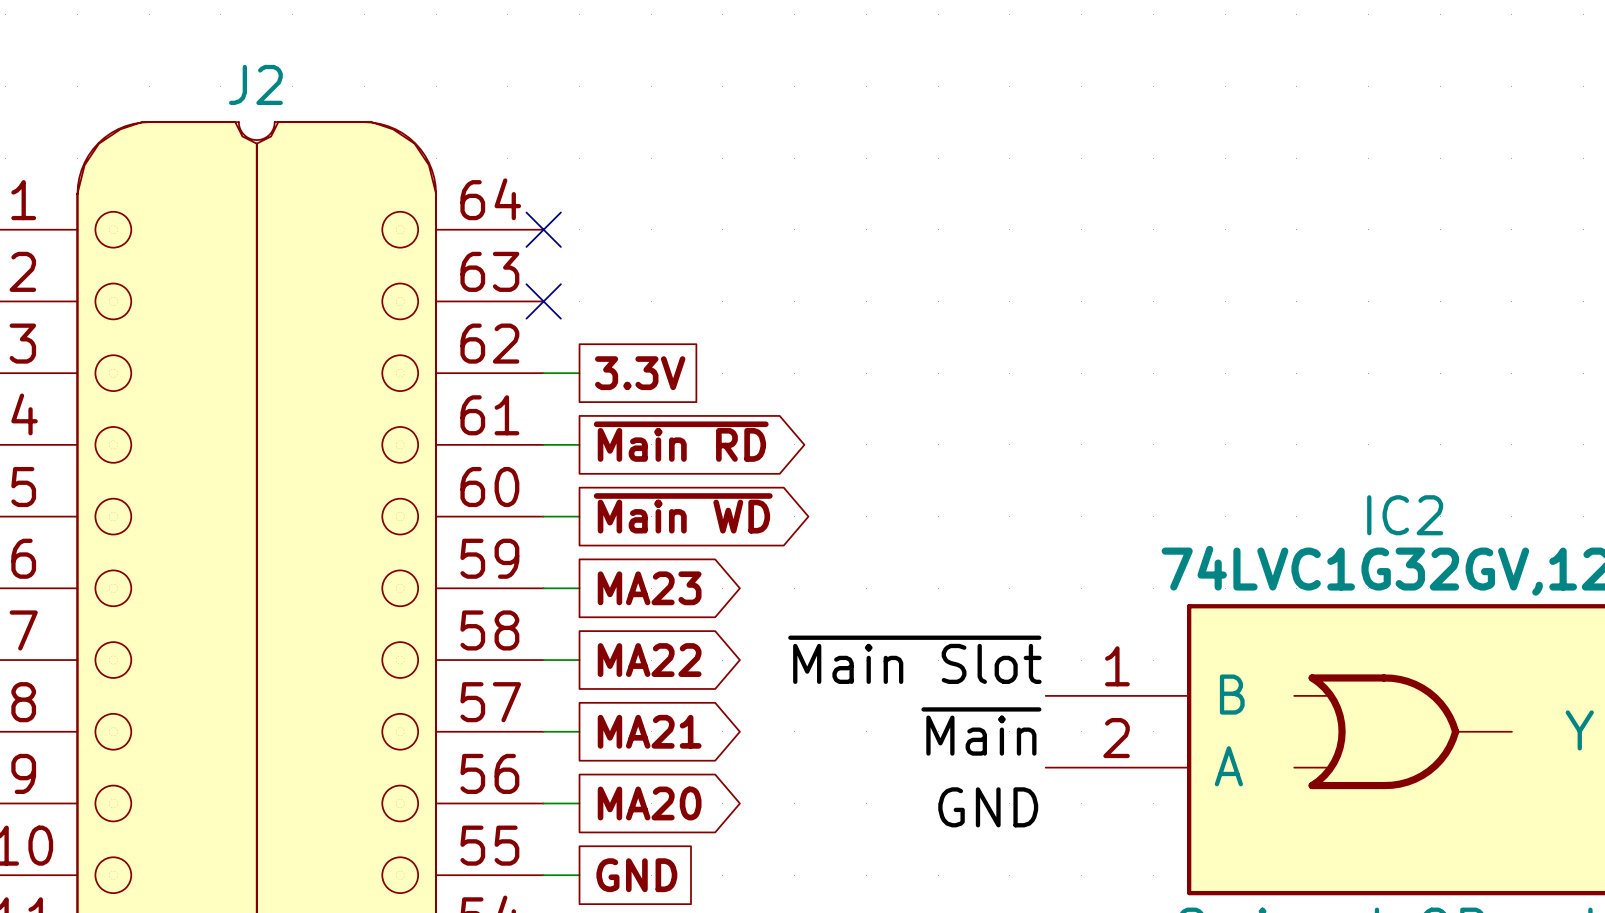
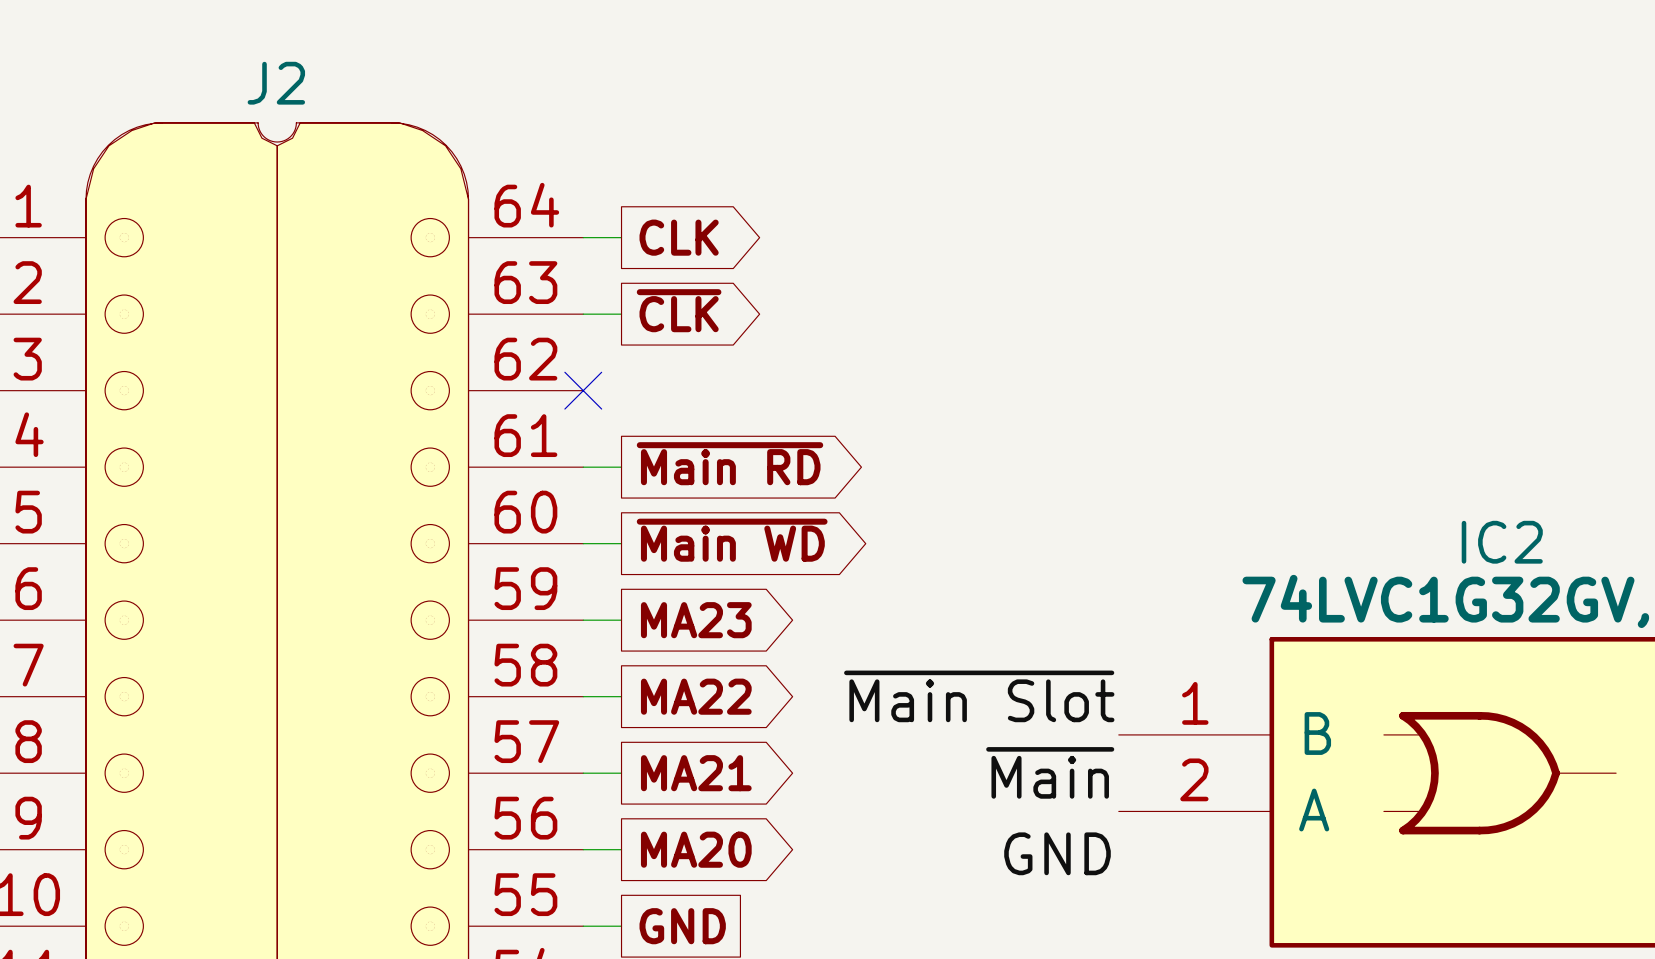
wire: none -> (583, 237) (621, 237)
no-connect mark: (543, 229) -> none
global label: none -> CLK (679, 237)
global label: none -> ~{CLK} (679, 310)
no-connect mark: (543, 301) -> none
wire: (543, 373) (579, 373) -> (583, 314) (621, 314)
no-connect mark: none -> (583, 390)
global label: 3.3V (640, 373) -> none

